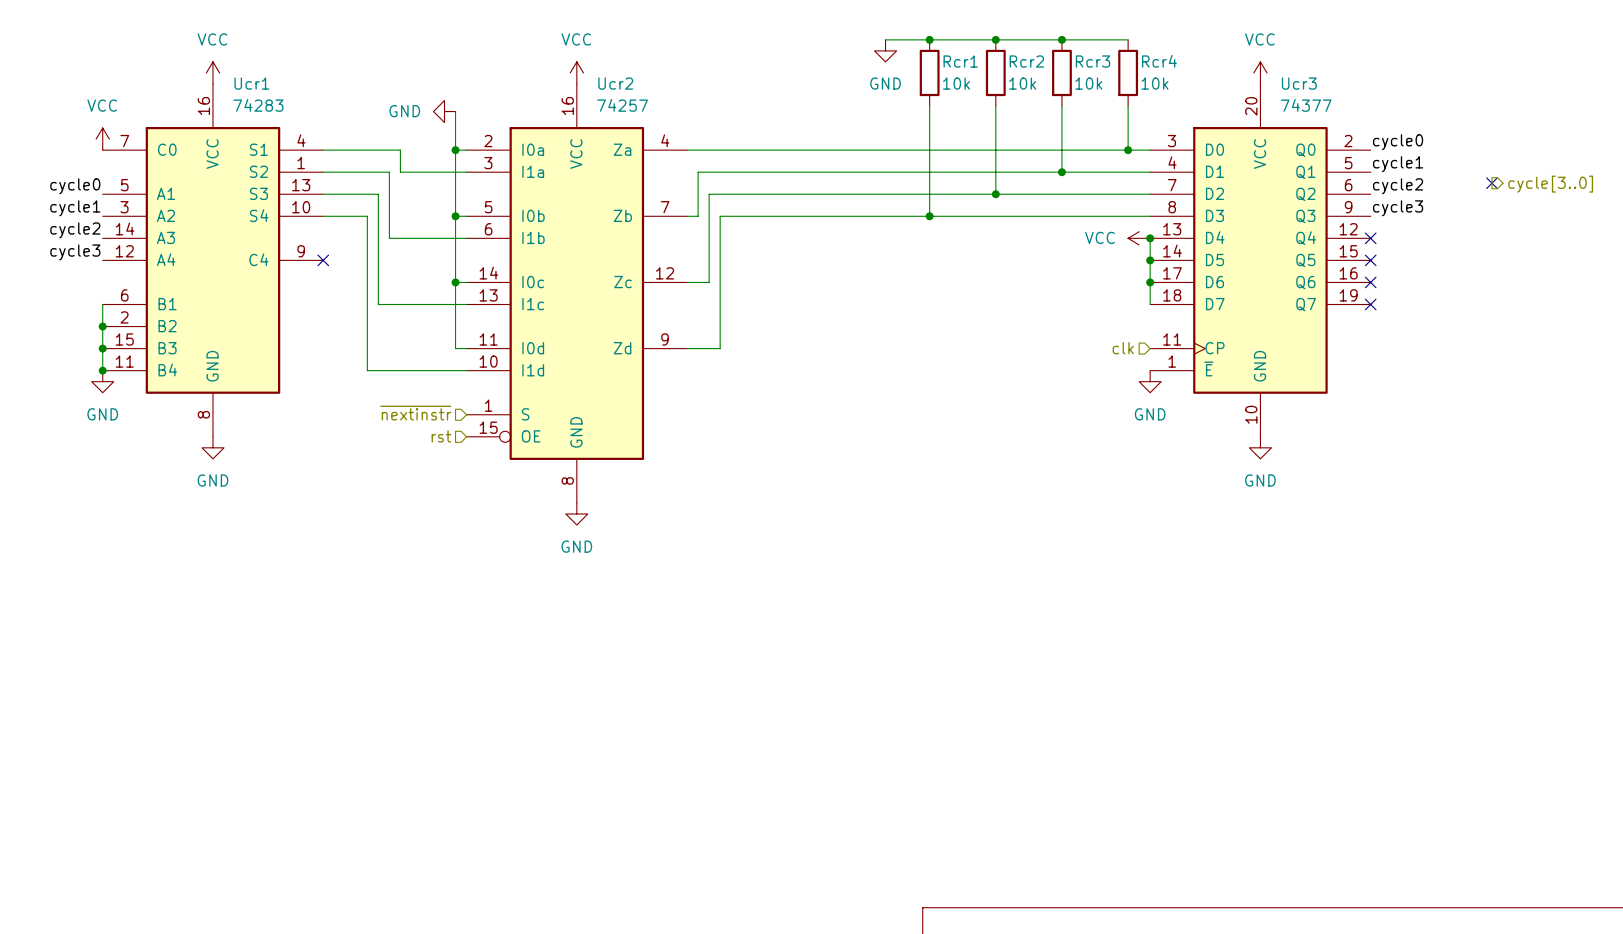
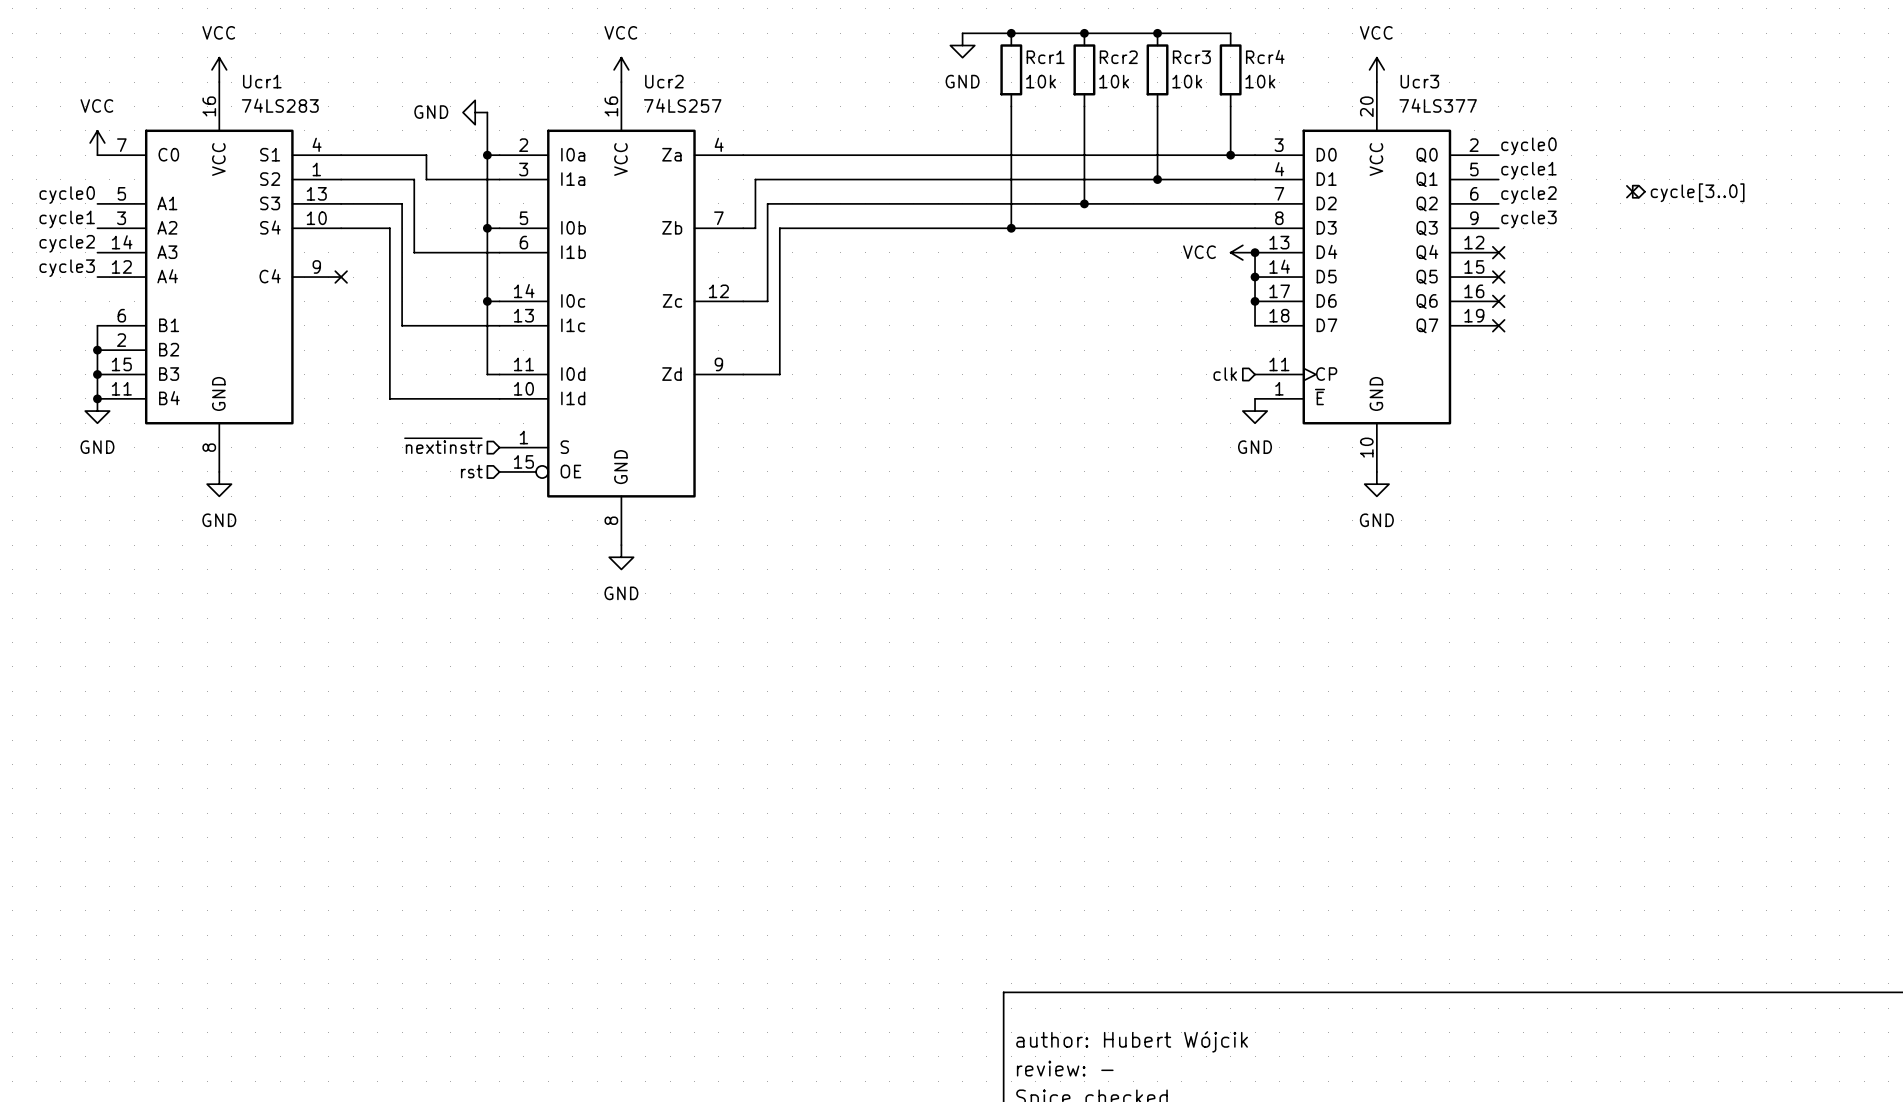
Ucr1 value: 74283 (258, 105) -> 74LS283 (280, 105)
Ucr2 value: 74257 (622, 105) -> 74LS257 (682, 105)
Ucr3 value: 74377 (1306, 105) -> 74LS377 (1438, 105)

